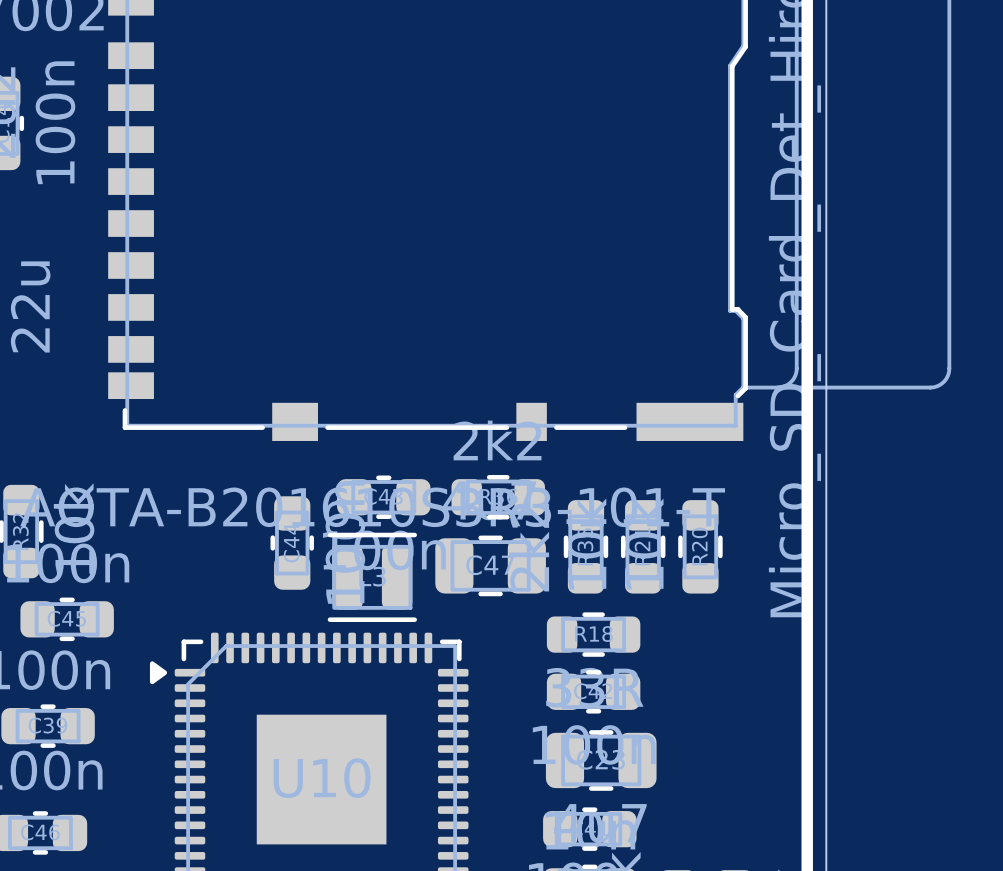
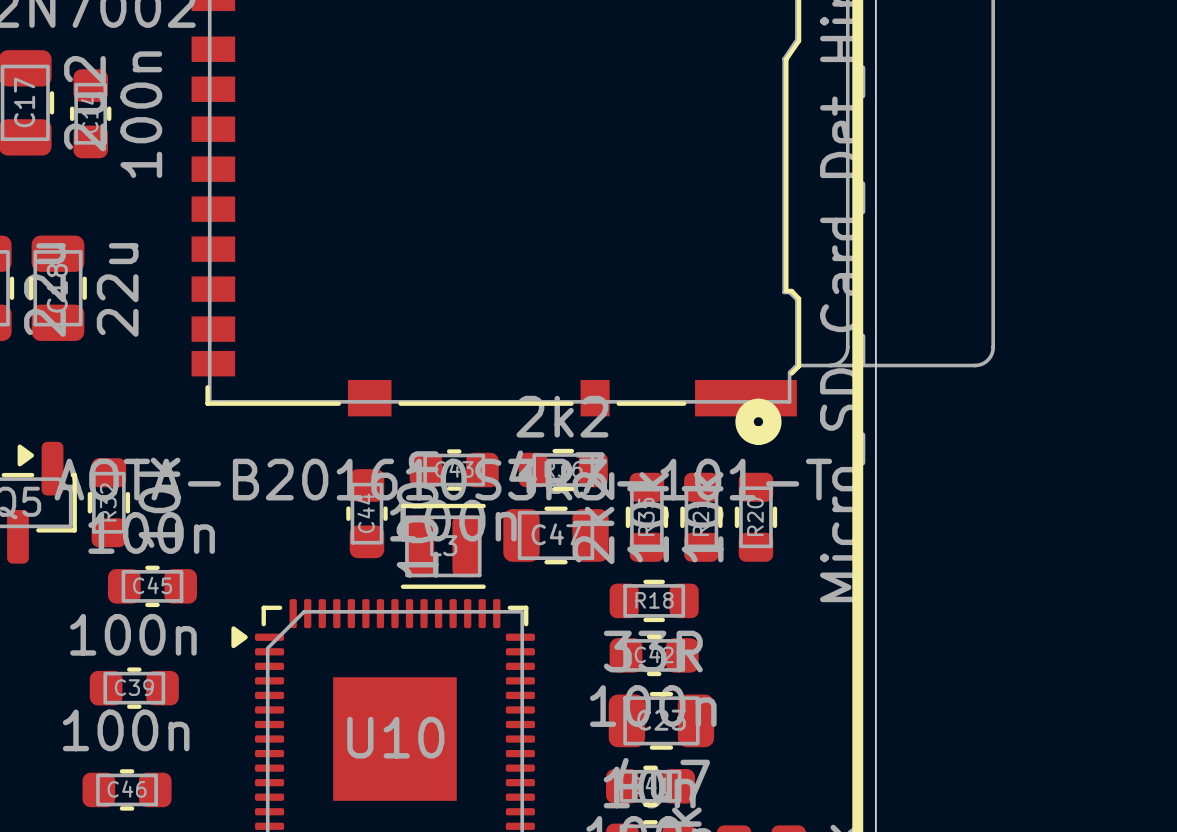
part: none -> (758, 421)

